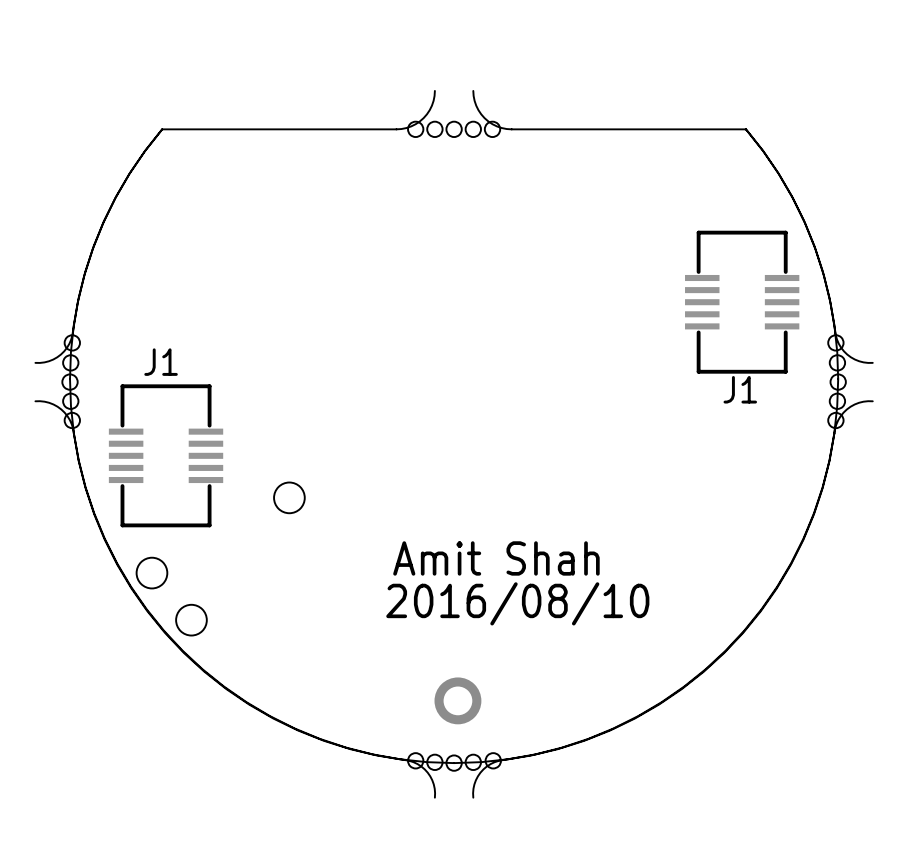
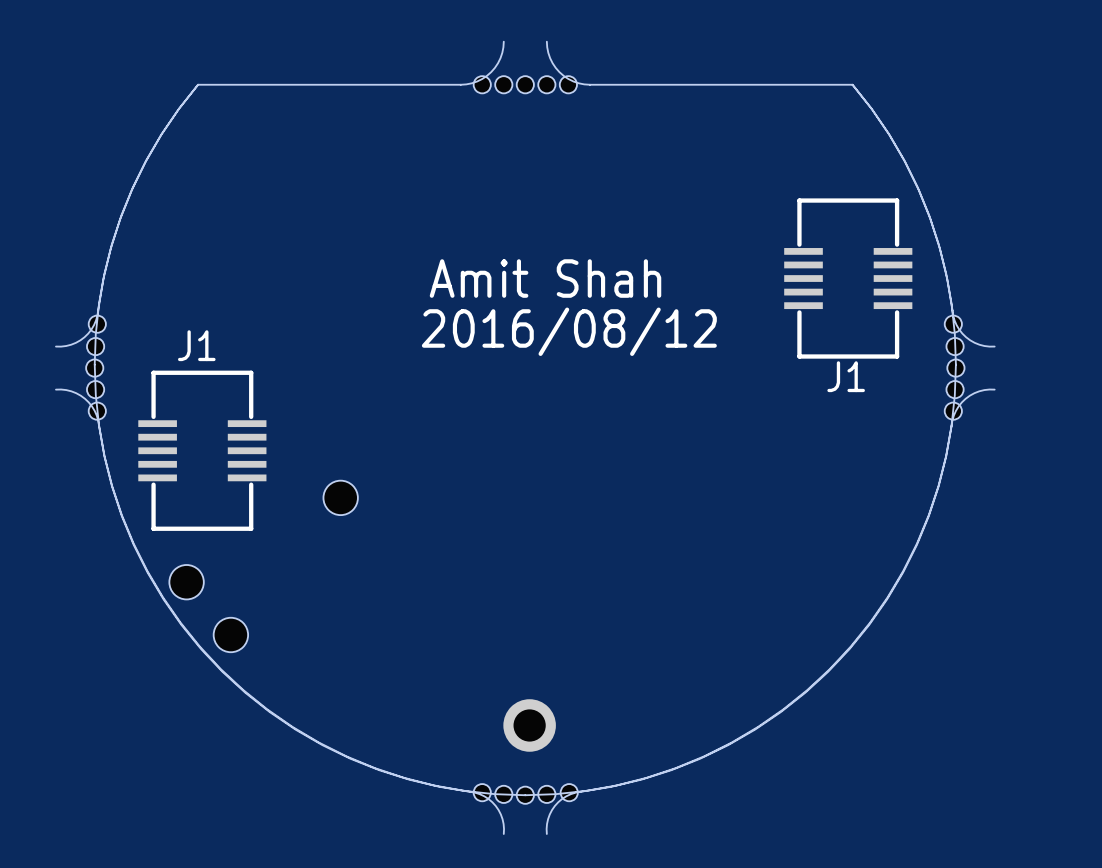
text: none -> 2016/08/12 (569, 331)
text position: Amit Shah (496, 558) -> Amit Shah (545, 278)
text: 2016/08/10 (517, 603) -> none

